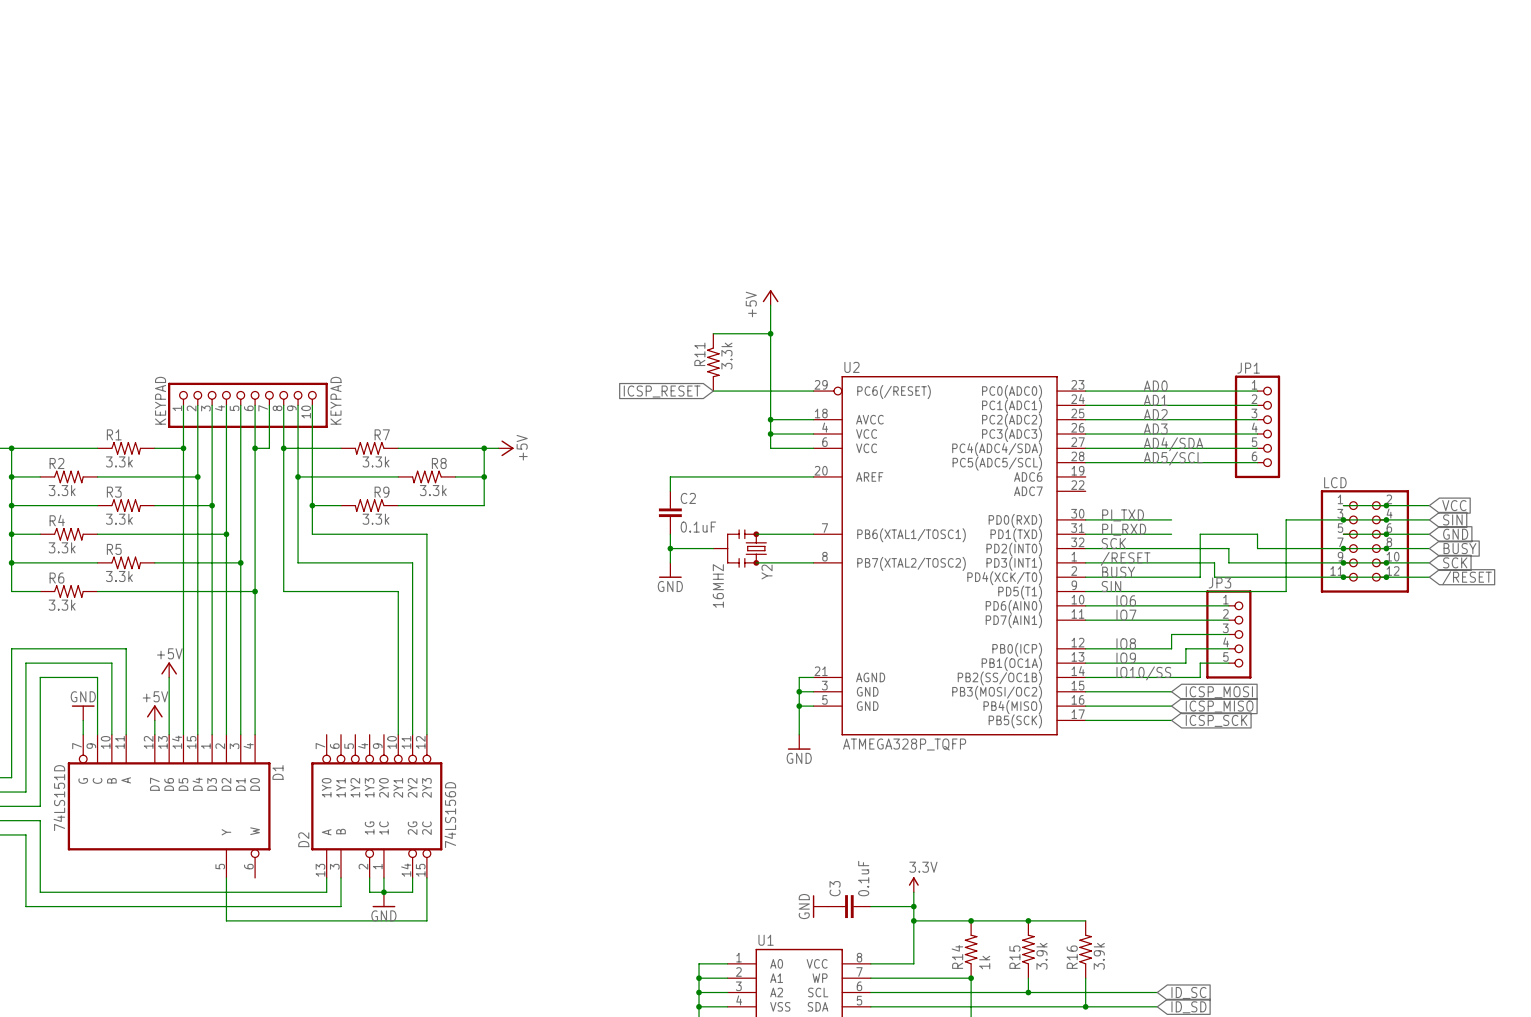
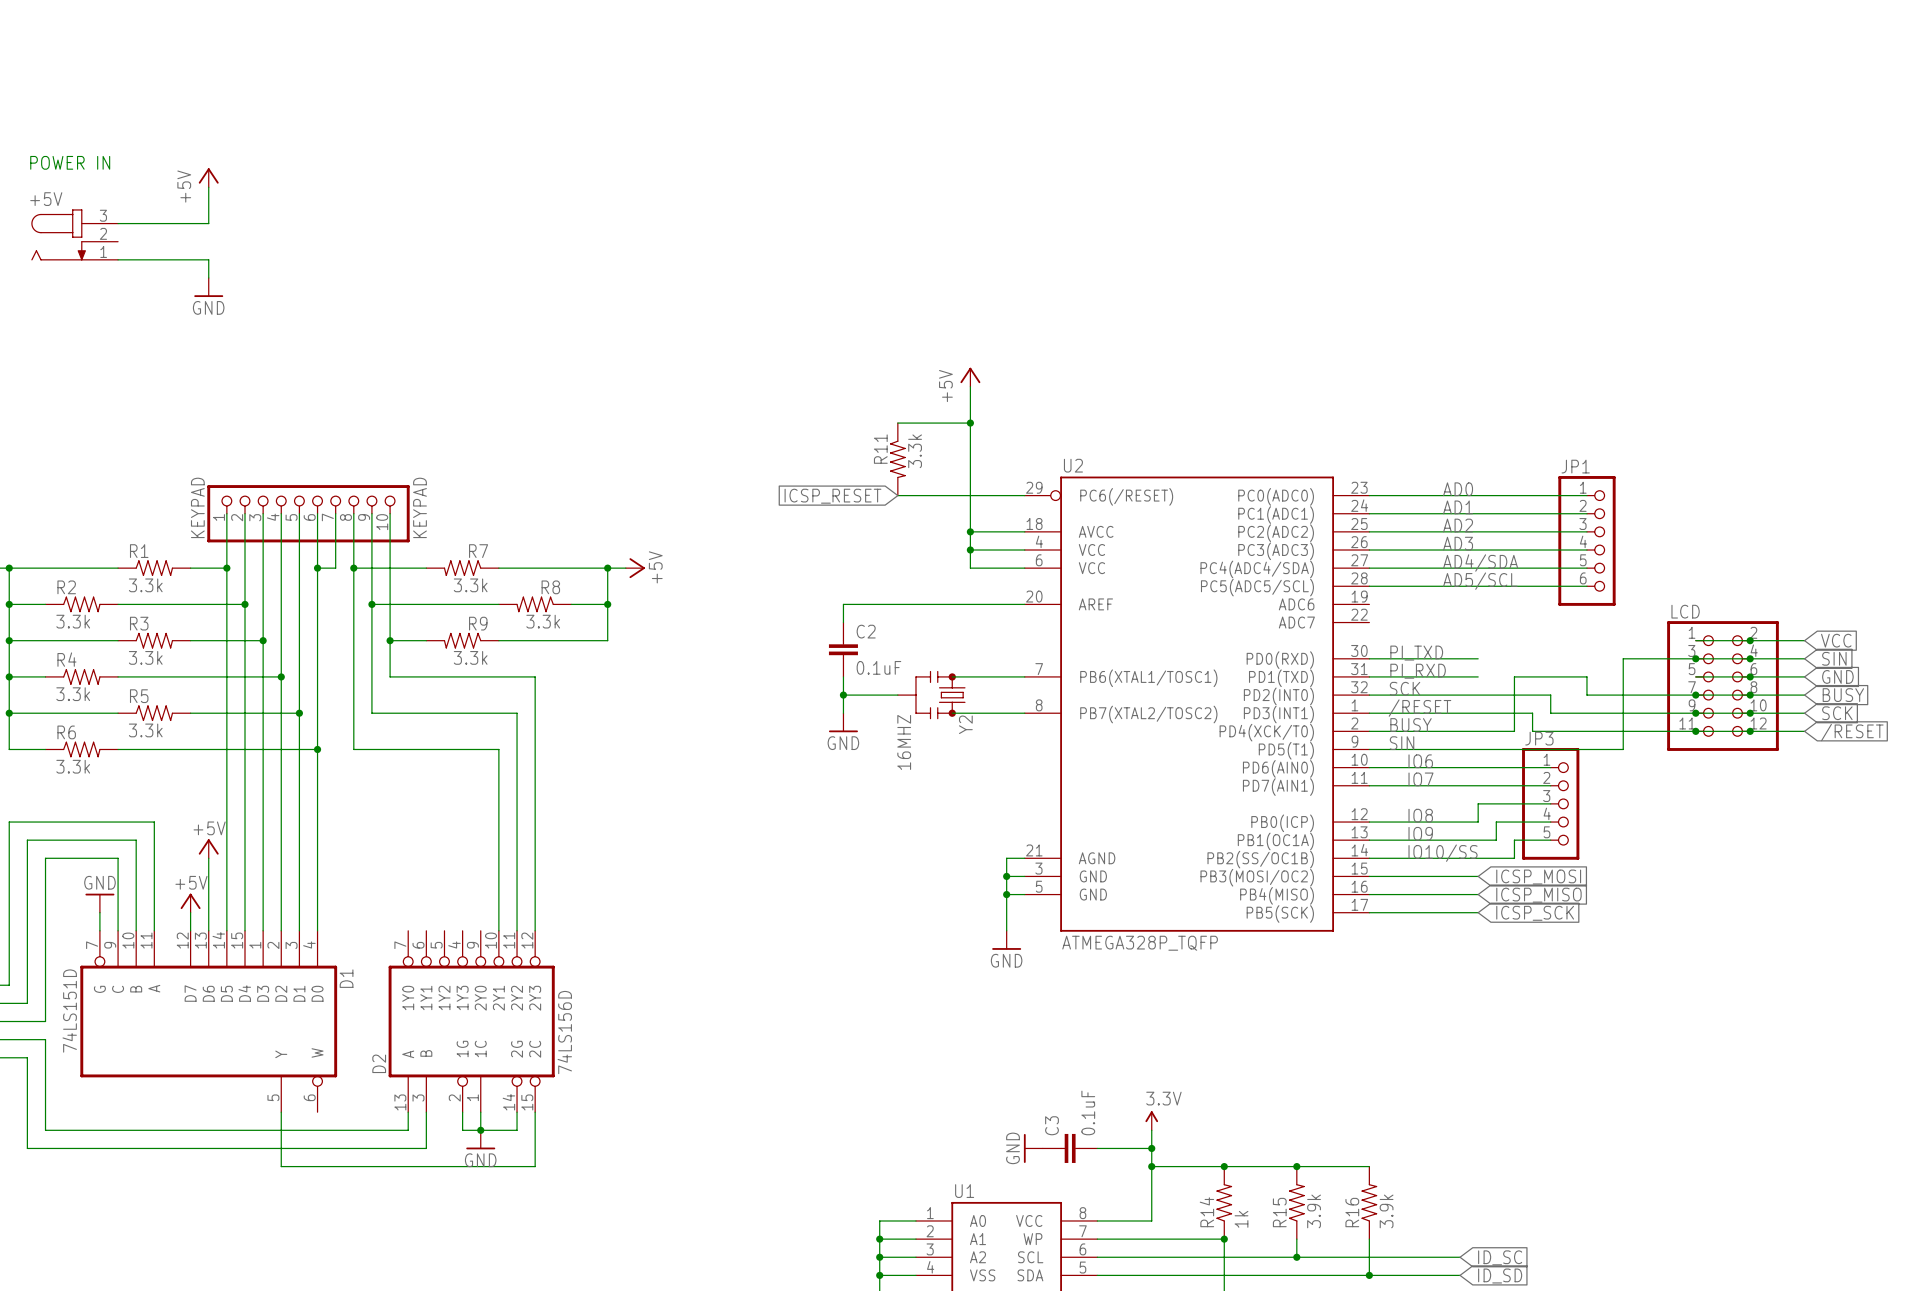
text: none -> POWER IN (70, 162)
power symbol: none -> +5V (208, 177)
wire: none -> (208, 187) (208, 223) (118, 223)
+5V: none -> (74, 234)
wire: none -> (118, 259) (208, 259) (208, 277)
power symbol: none -> GND (208, 287)

